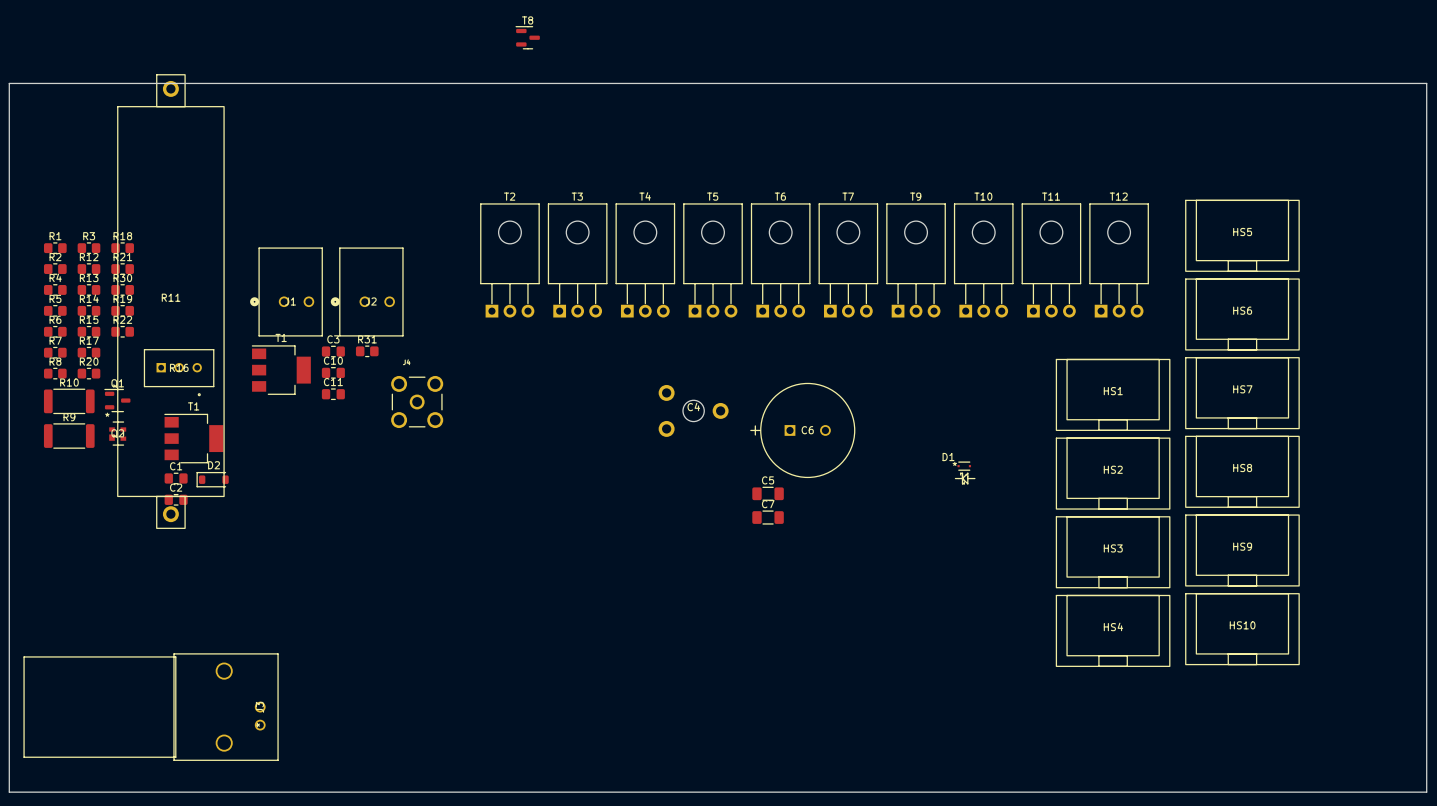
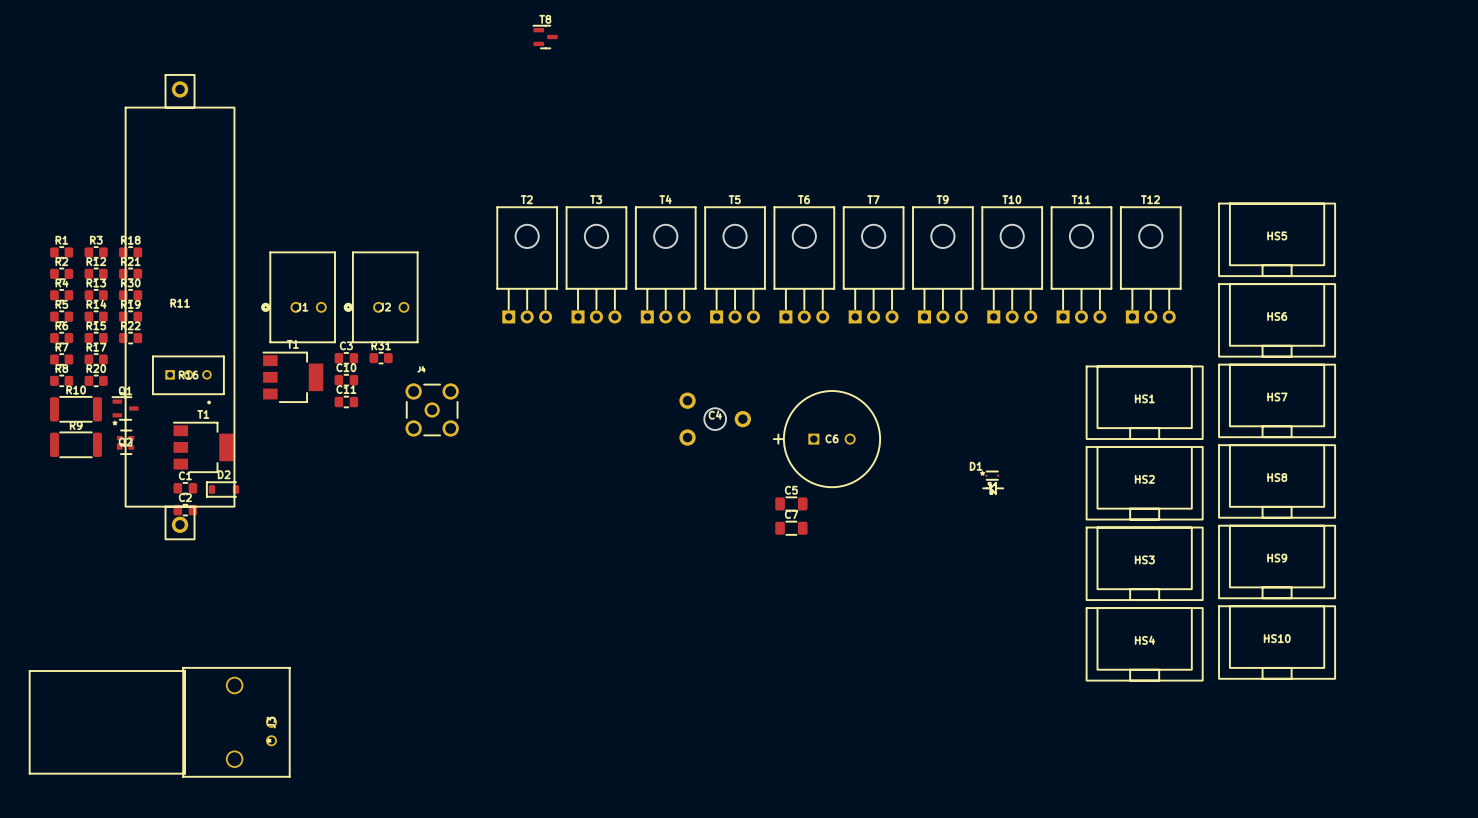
board edge: (9, 83) (1426, 83) (1426, 792) (9, 792) (9, 83) -> none

